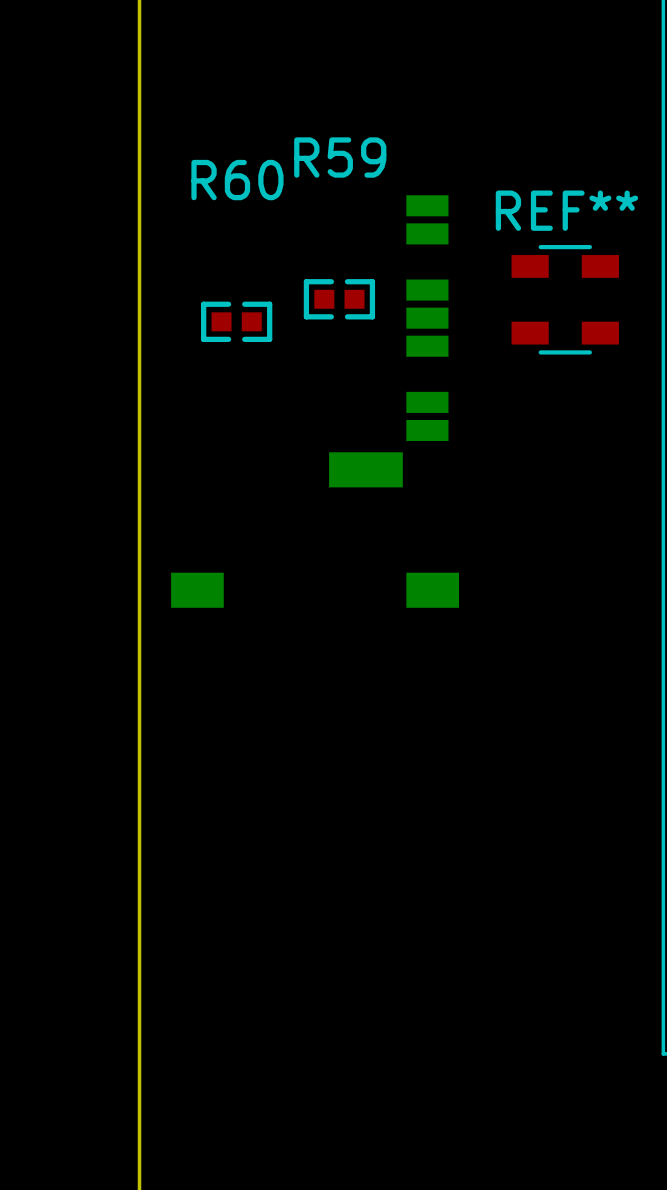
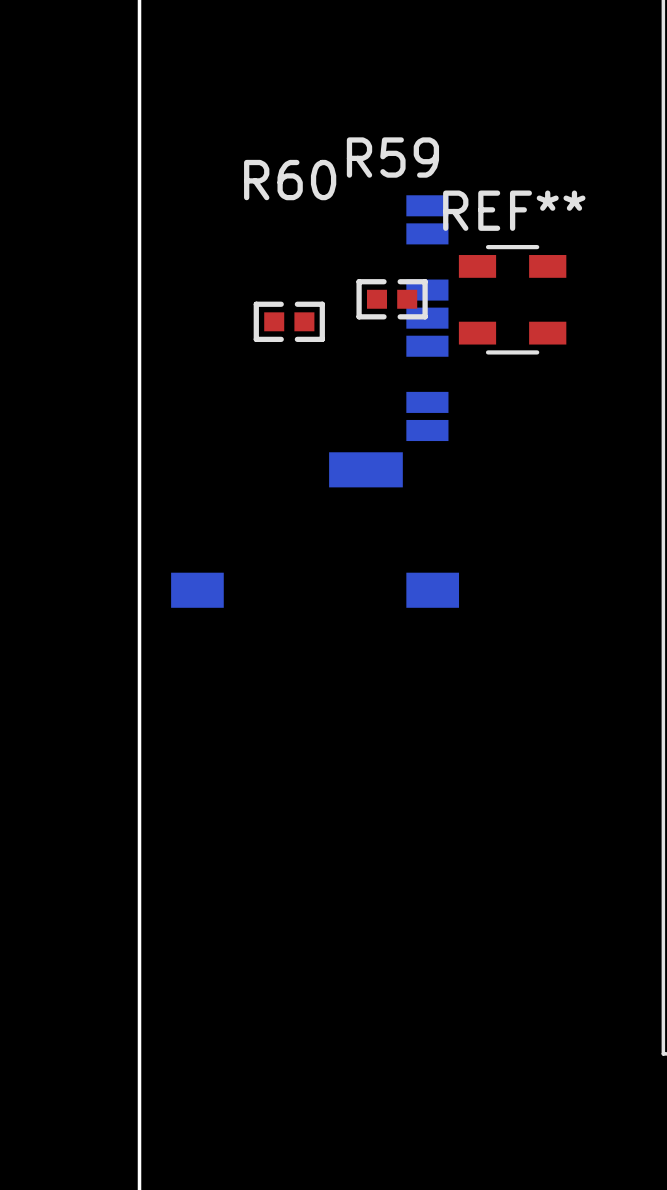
R59 position: (339, 299) -> (392, 299)
REF** position: (565, 299) -> (512, 299)
R60 position: (236, 321) -> (289, 321)

